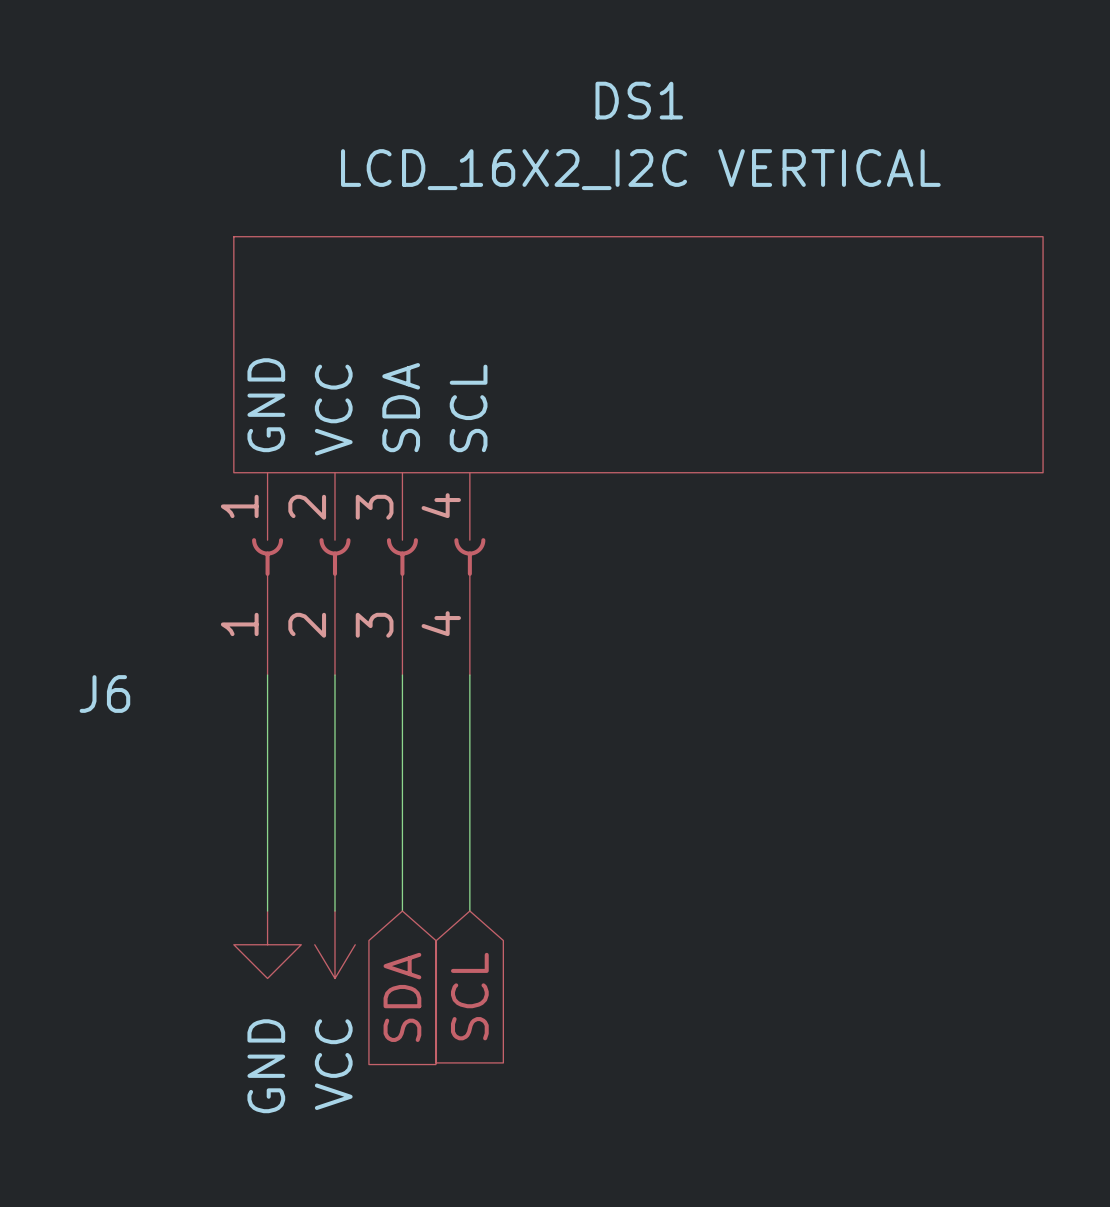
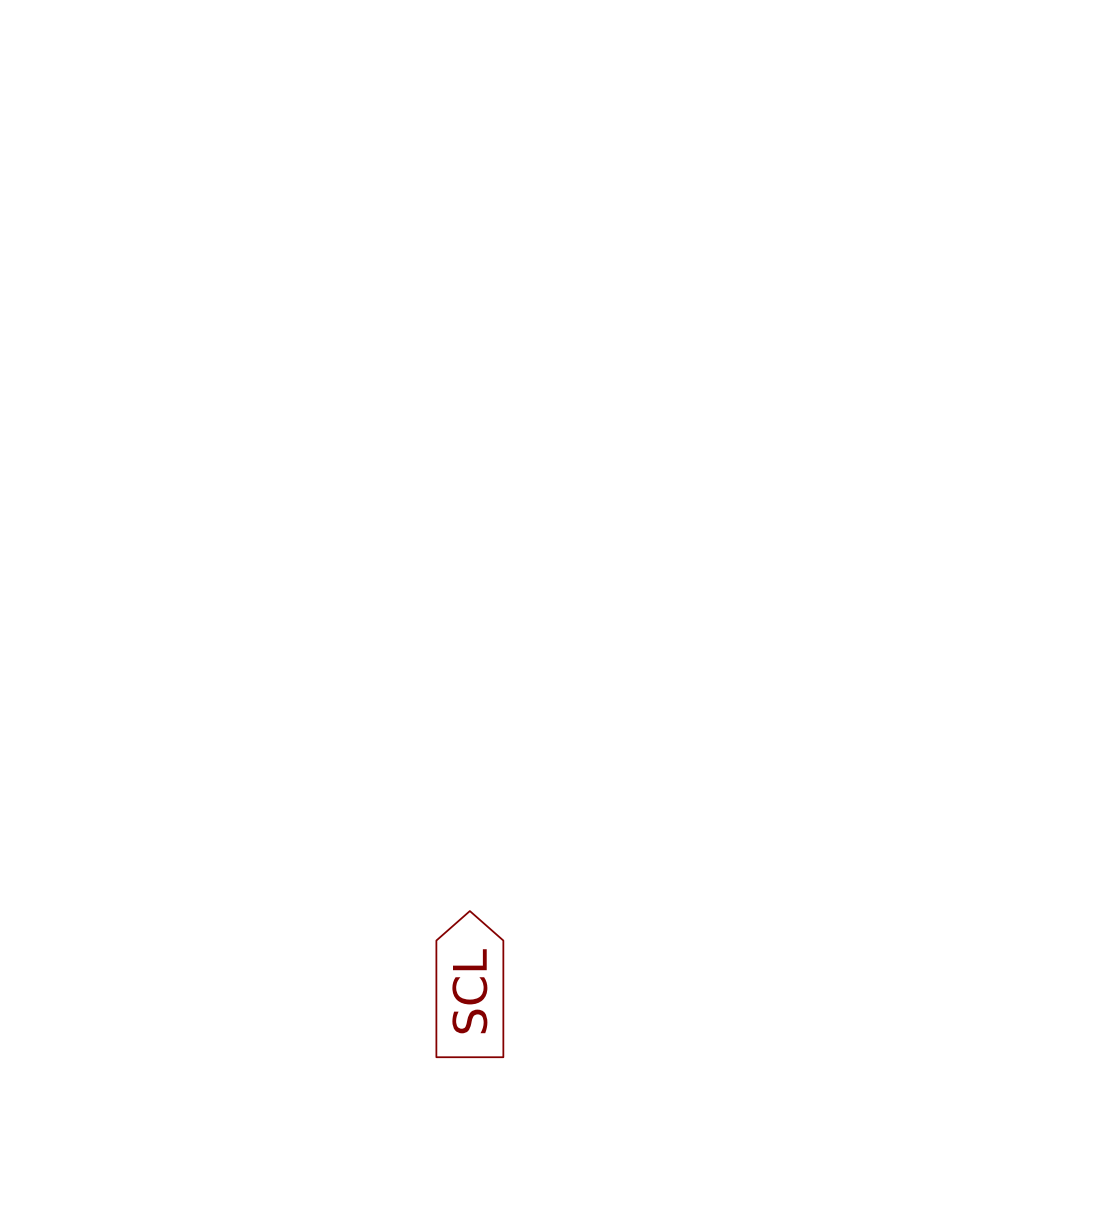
DS1: LCD_16X2_I2C VERTICAL (638, 388) -> none
J6: (368, 606) -> none
wire: (267, 675) (267, 911) -> none
wire: (334, 675) (334, 911) -> none
wire: (402, 675) (402, 911) -> none
wire: (469, 675) (469, 911) -> none
power symbol: GND (267, 944) -> none
power symbol: VCC (334, 944) -> none
global label: SDA (402, 997) -> none

